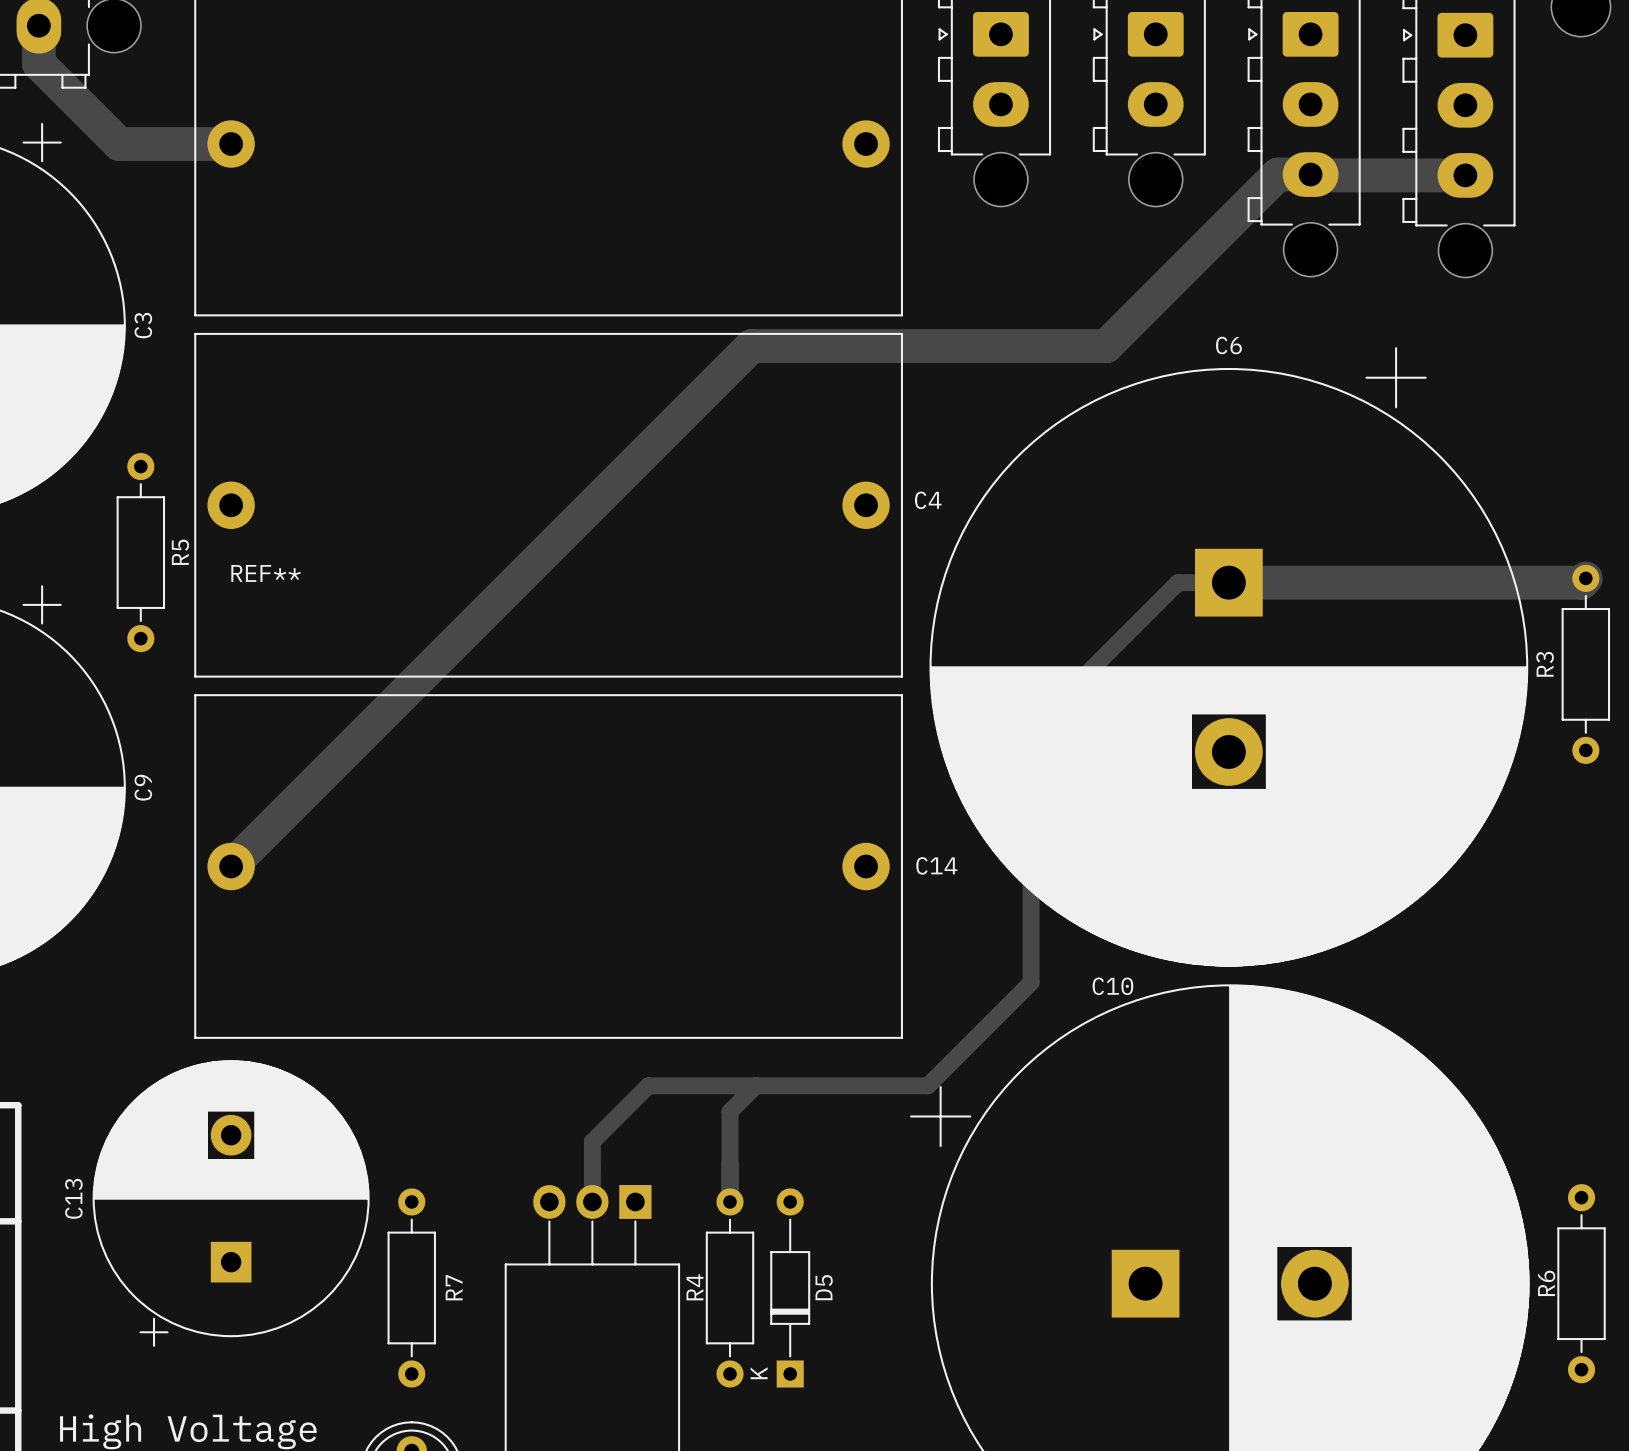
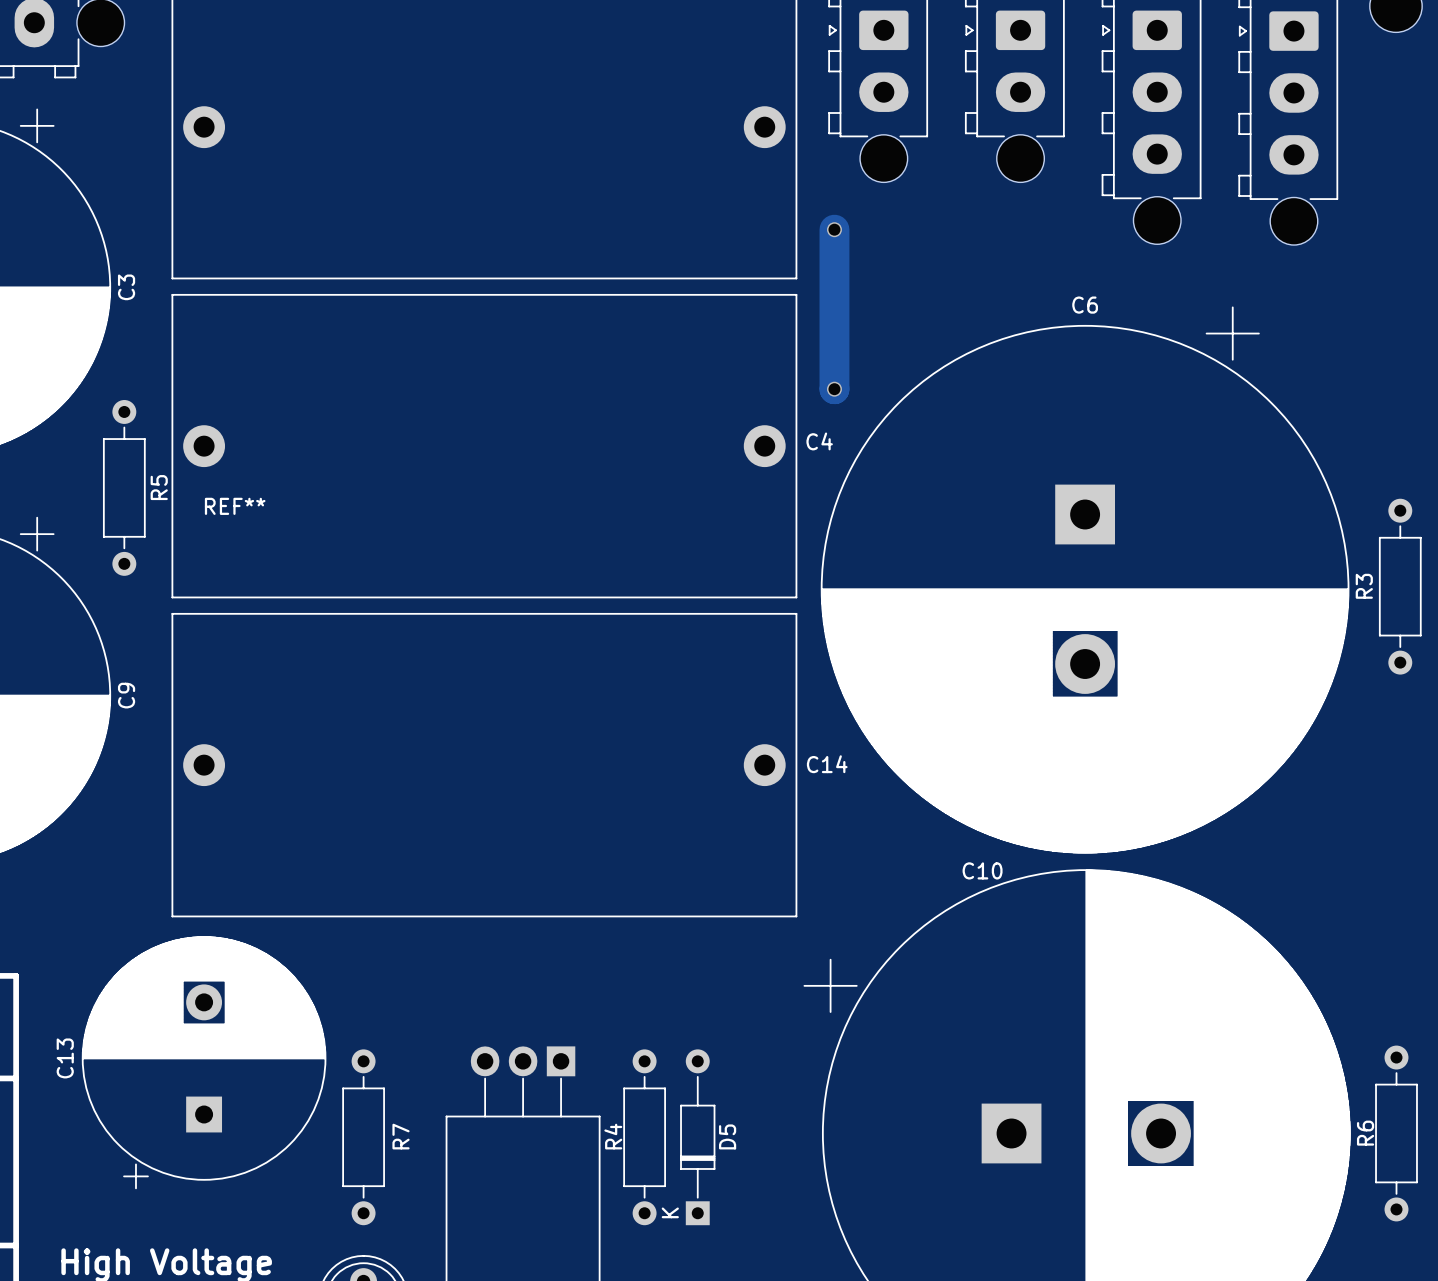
track: (38, 25) (38, 63) (119, 144) (231, 144) -> none
track: (1465, 175) (1277, 174) (1106, 346) (751, 346) (231, 866) -> none
track: none -> (834, 229) (834, 389)
via: none -> (834, 229)
via: none -> (834, 389)
track: (1585, 578) (1581, 582) (1178, 582) (1031, 729) (1031, 982) (927, 1085) (648, 1085) (592, 1141) (592, 1201) -> none
track: (755, 1085) (730, 1111) (730, 1201) -> none

